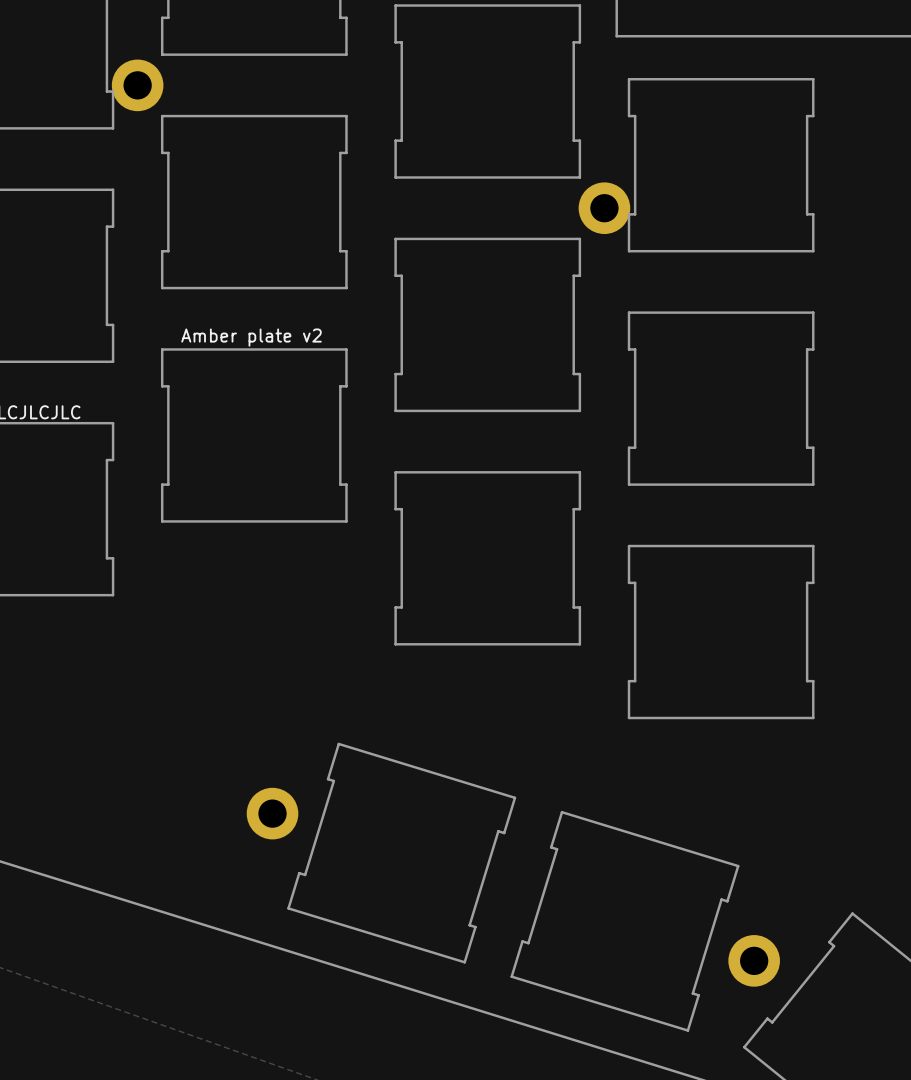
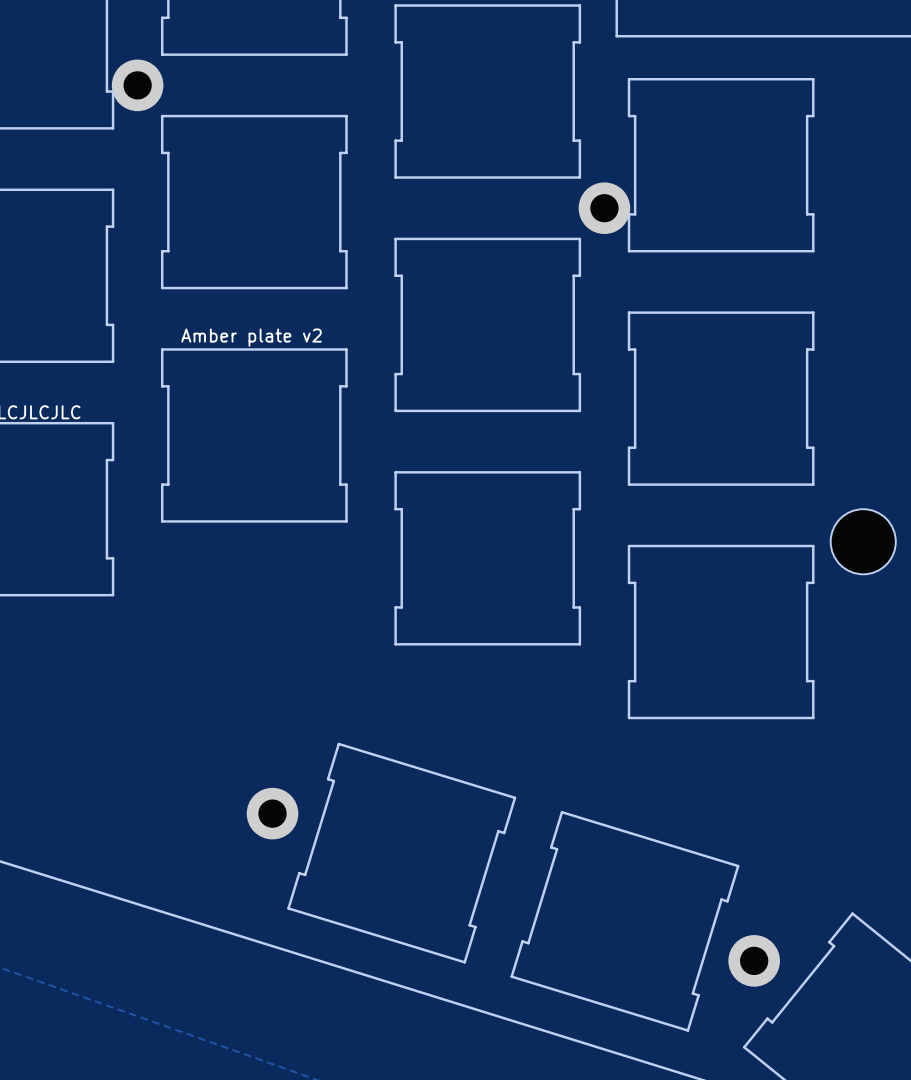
part: none -> (863, 541)

